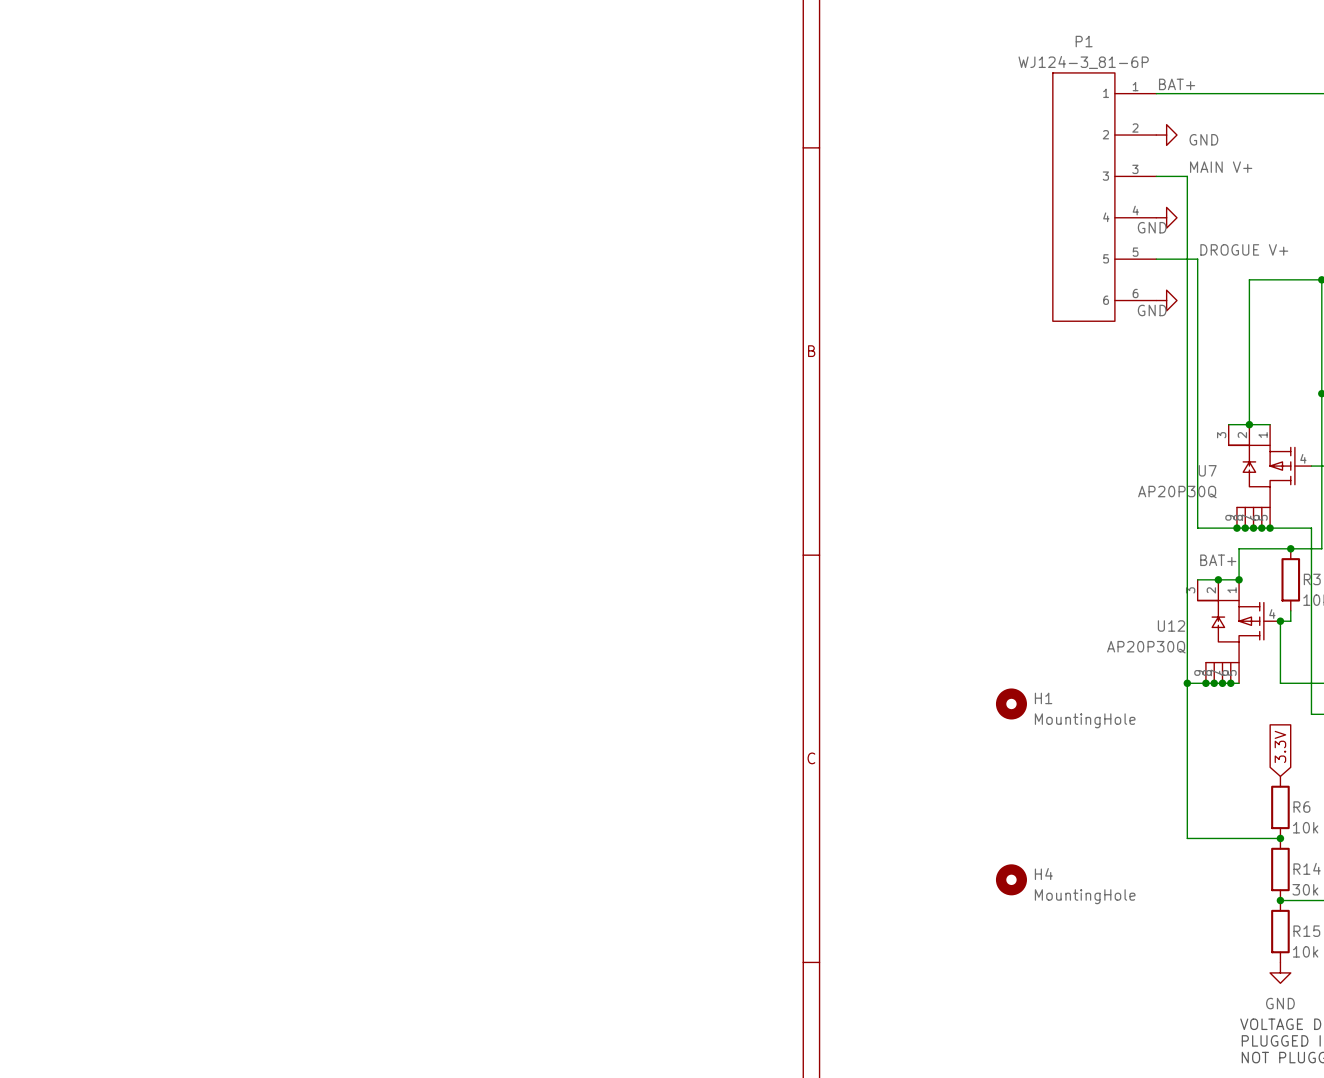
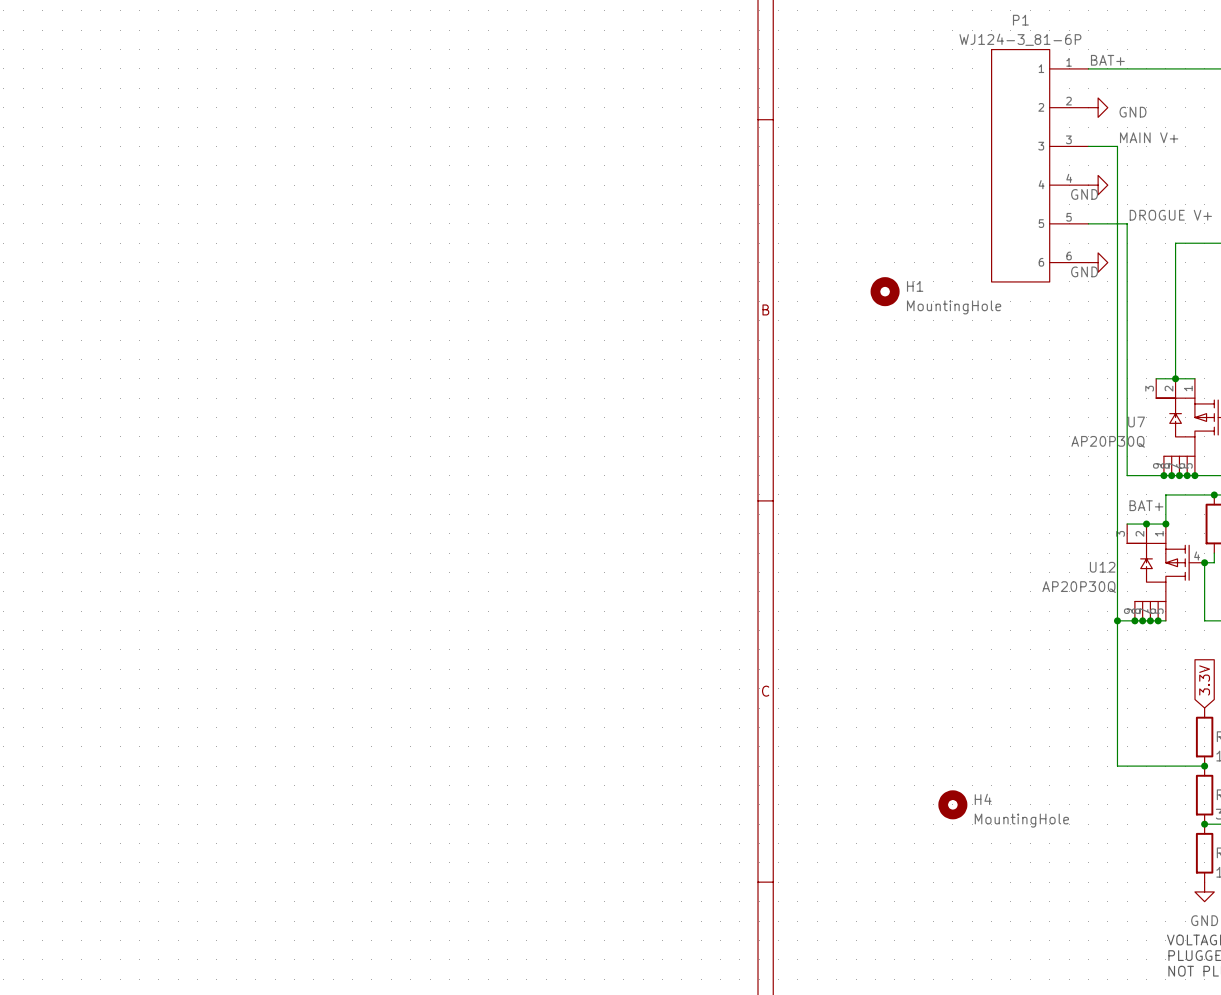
H1 position: (1011, 703) -> (885, 291)

